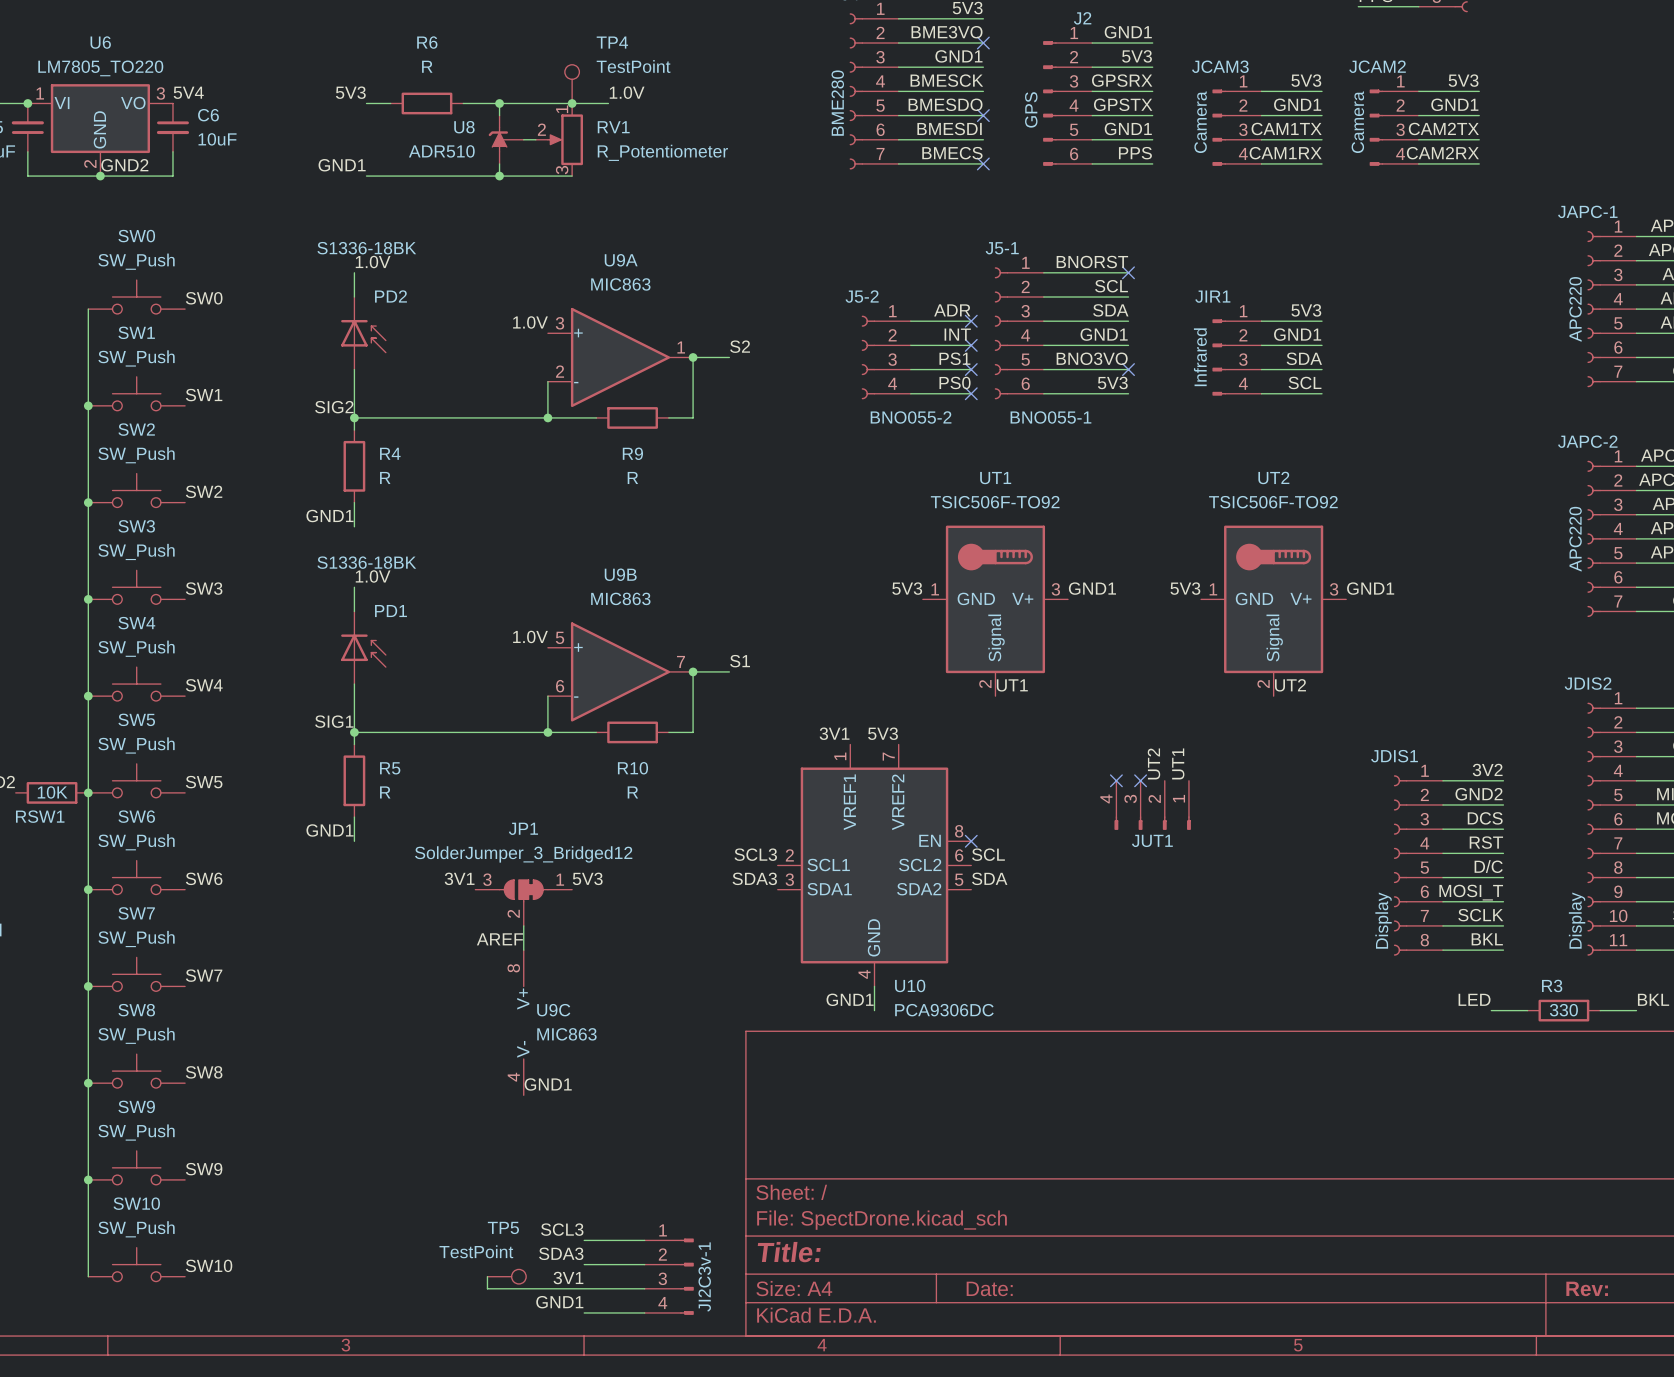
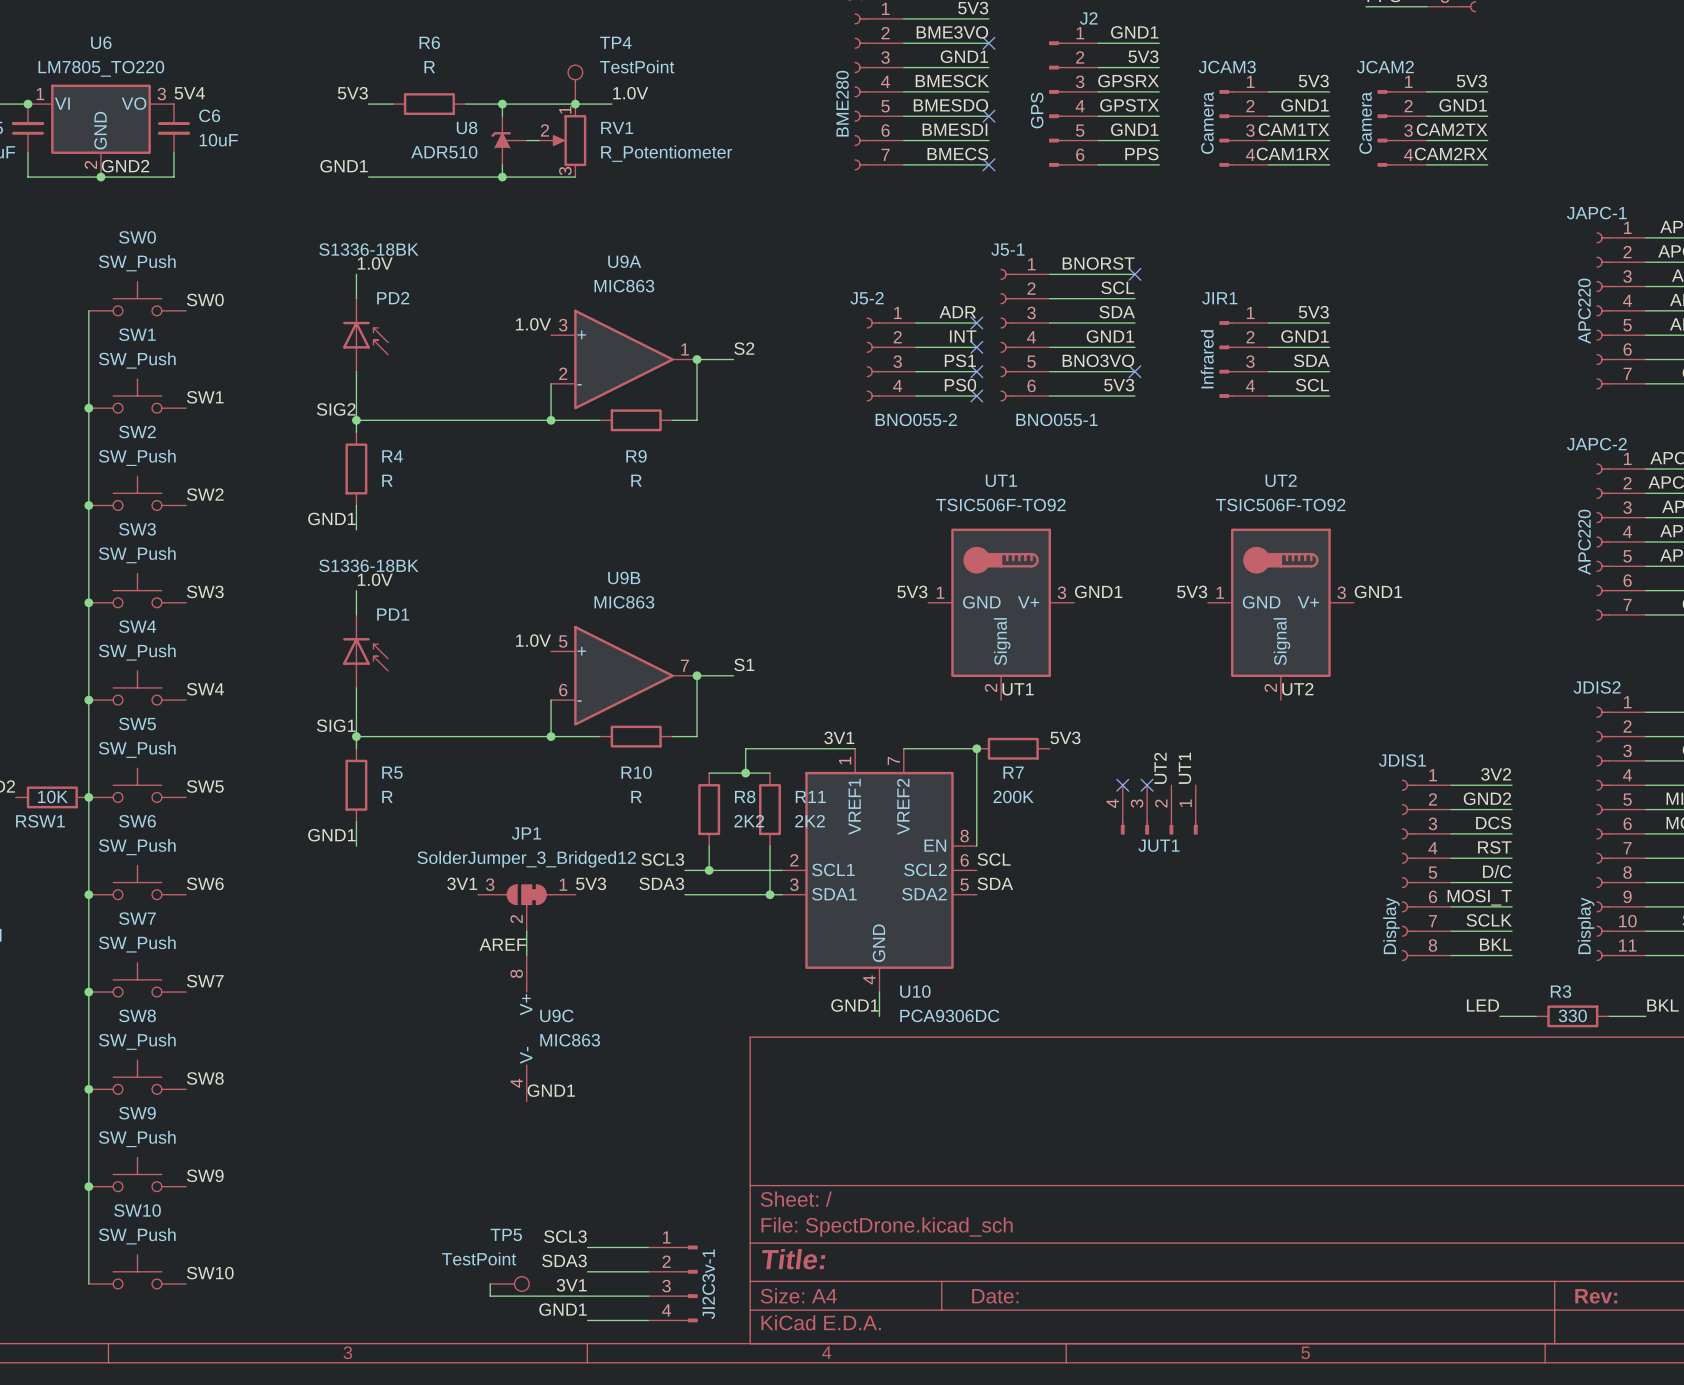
label position: 5V3 (883, 733) -> 5V3 (1065, 737)
wire: none -> (855, 748) (745, 748) (745, 773)
wire: none -> (903, 748) (976, 748) (976, 846)
junction: none -> (976, 748)
R7: none -> 200K (1013, 748)
wire: none -> (709, 773) (770, 773)
junction: none -> (745, 773)
R8: none -> 2K2 (709, 809)
R11: none -> 2K2 (770, 809)
wire: none -> (709, 846) (709, 870)
wire: none -> (770, 846) (770, 894)
no-connect mark: (971, 841) -> none
label position: SCL3 (755, 854) -> SCL3 (662, 859)
wire: none -> (684, 870) (782, 870)
junction: none -> (709, 870)
label position: SDA3 (754, 878) -> SDA3 (661, 883)
wire: none -> (684, 894) (782, 894)
junction: none -> (770, 894)

